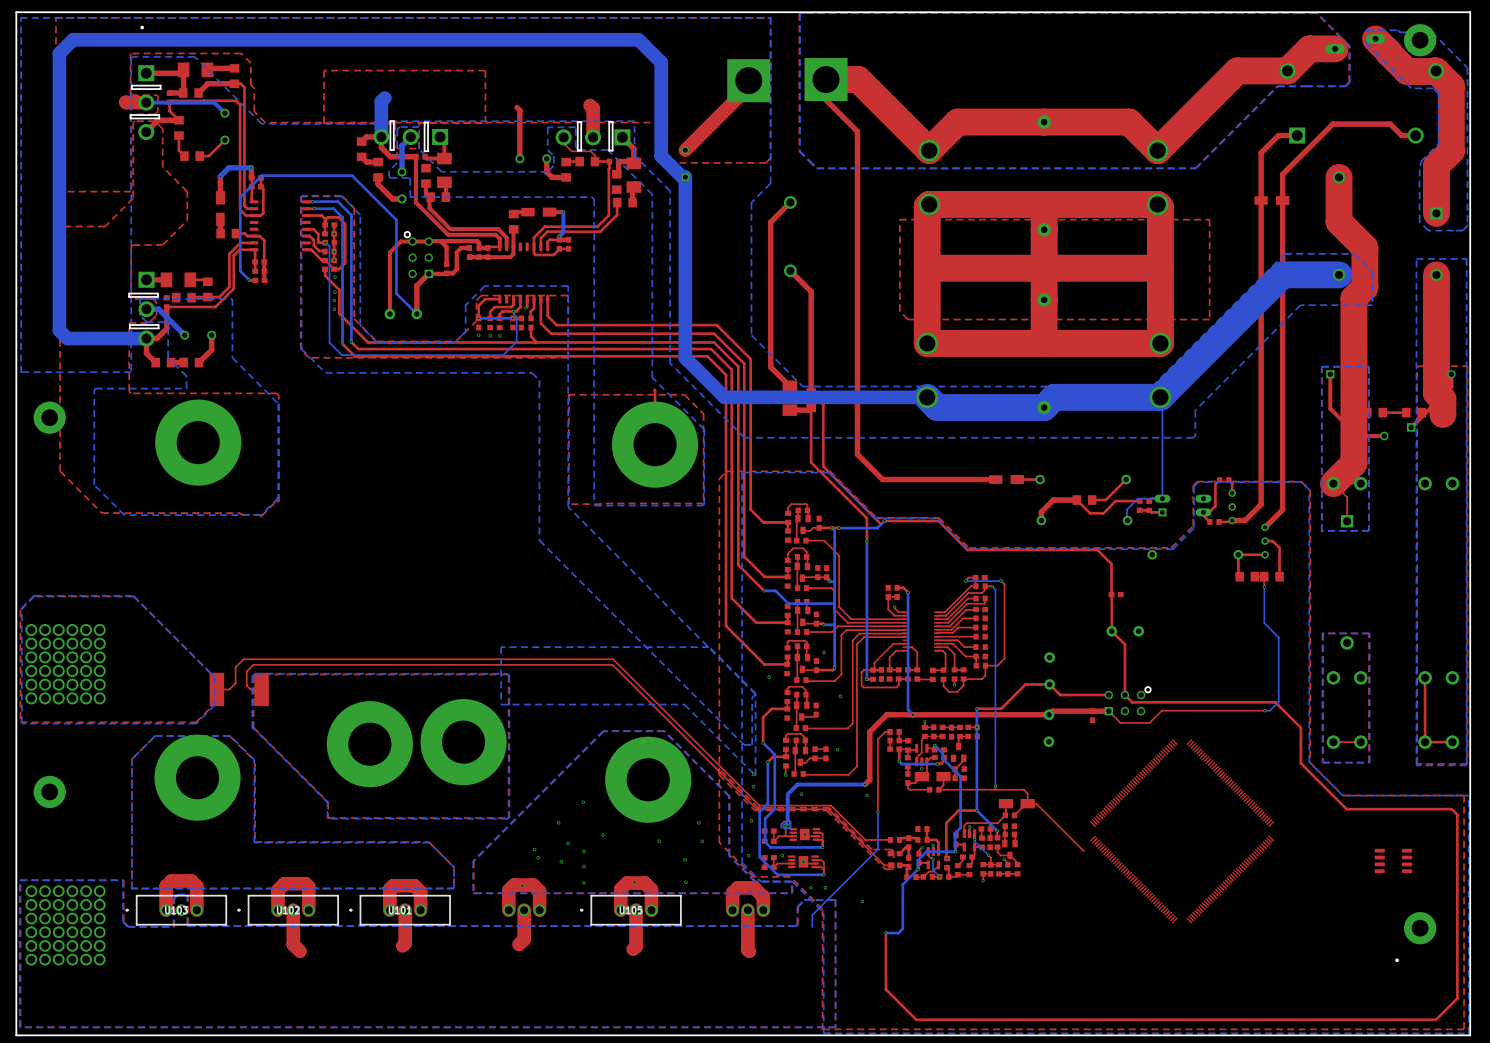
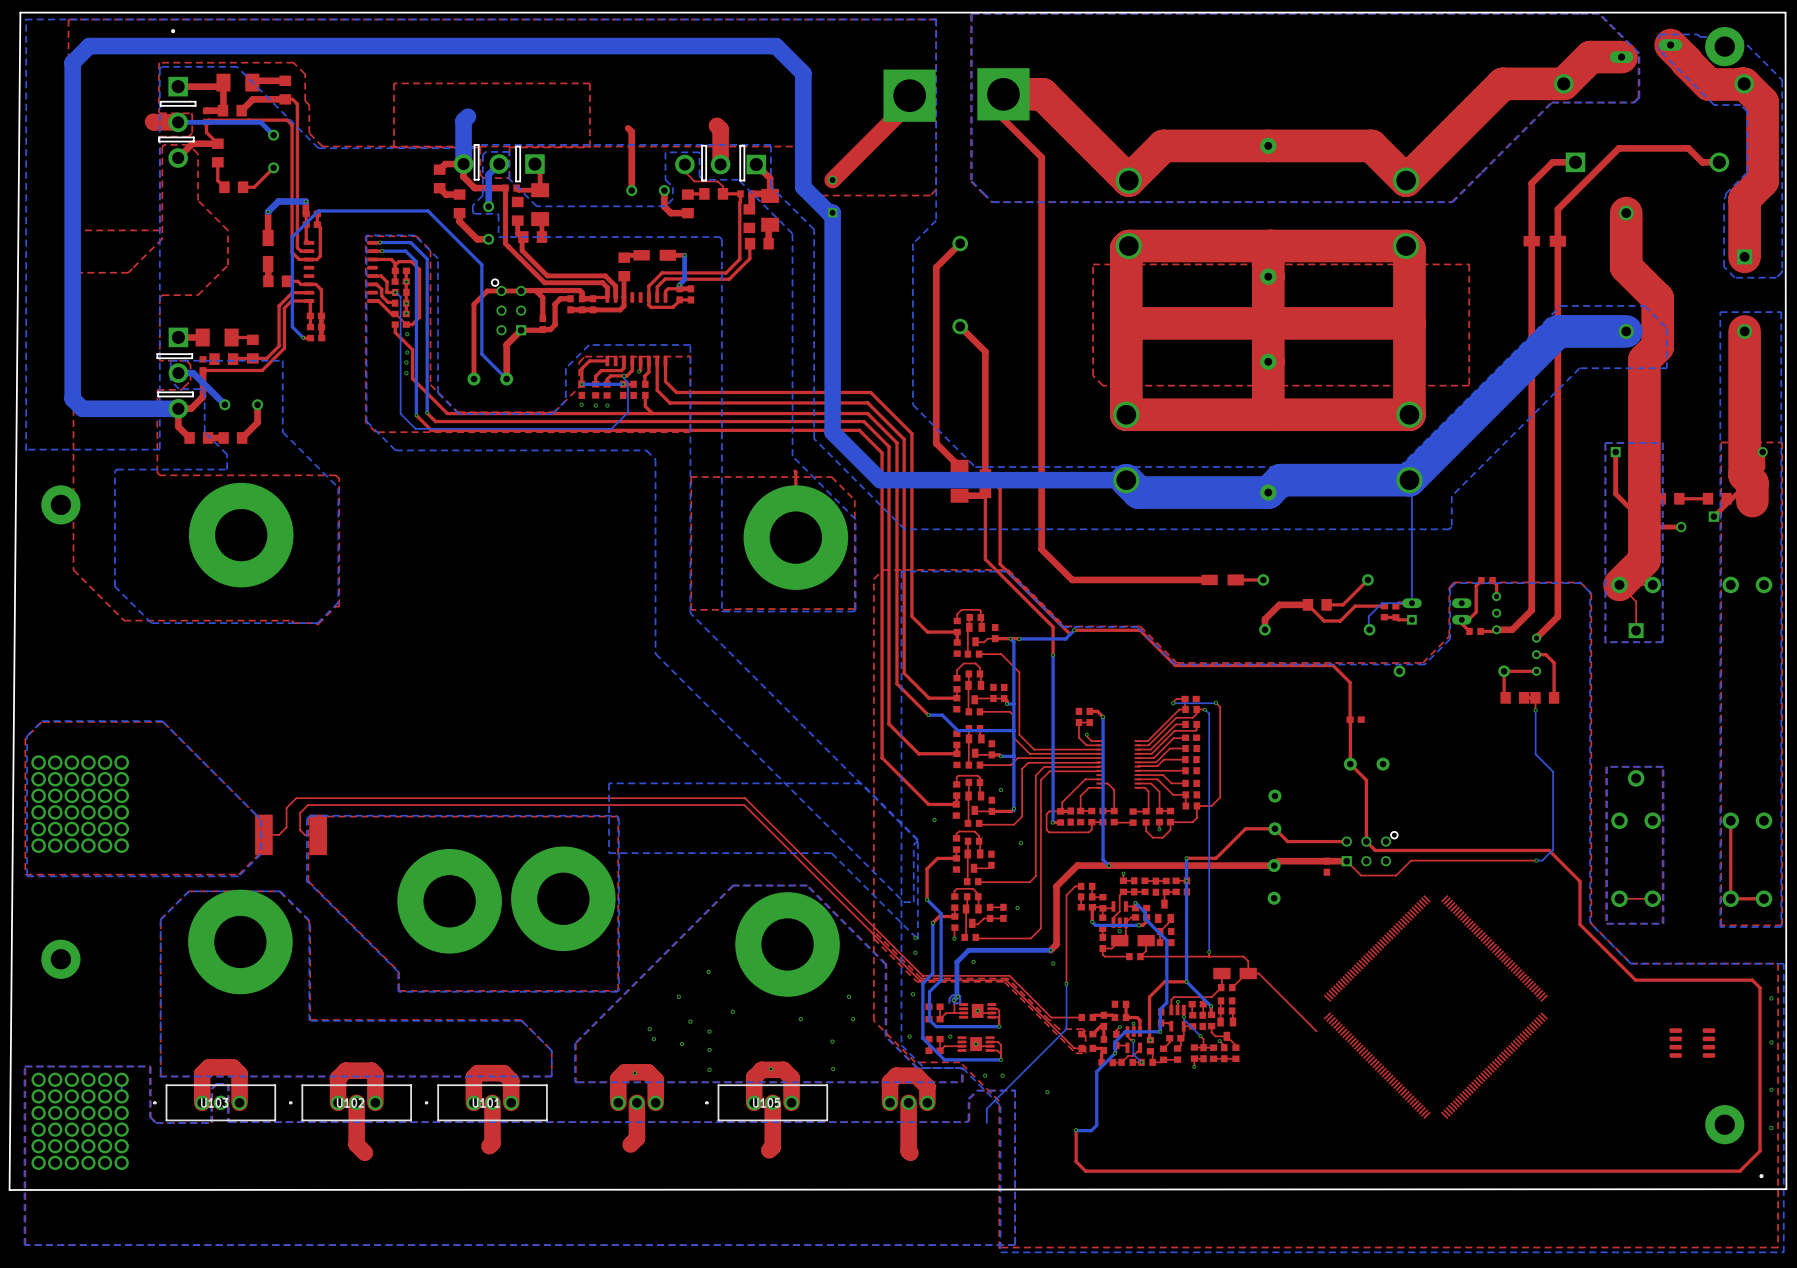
board edge: (1470, 12) (1470, 1035) (16, 1035) (16, 12) -> (1785, 12) (1786, 1189) (9, 1190) (20, 12)
top track: (1442, 809) (1451, 809) (1457, 814) (1457, 998) (1436, 1019) (916, 1019) (885, 989) (885, 958) -> (1752, 980) (1759, 987) (1759, 1151) (1739, 1171) (1085, 1171) (1076, 1161)
via: none -> (1771, 998)
via: none -> (1771, 1042)
via: none -> (1771, 1089)
via: none -> (1771, 1127)
hole position: (1397, 960) -> (1761, 1176)

